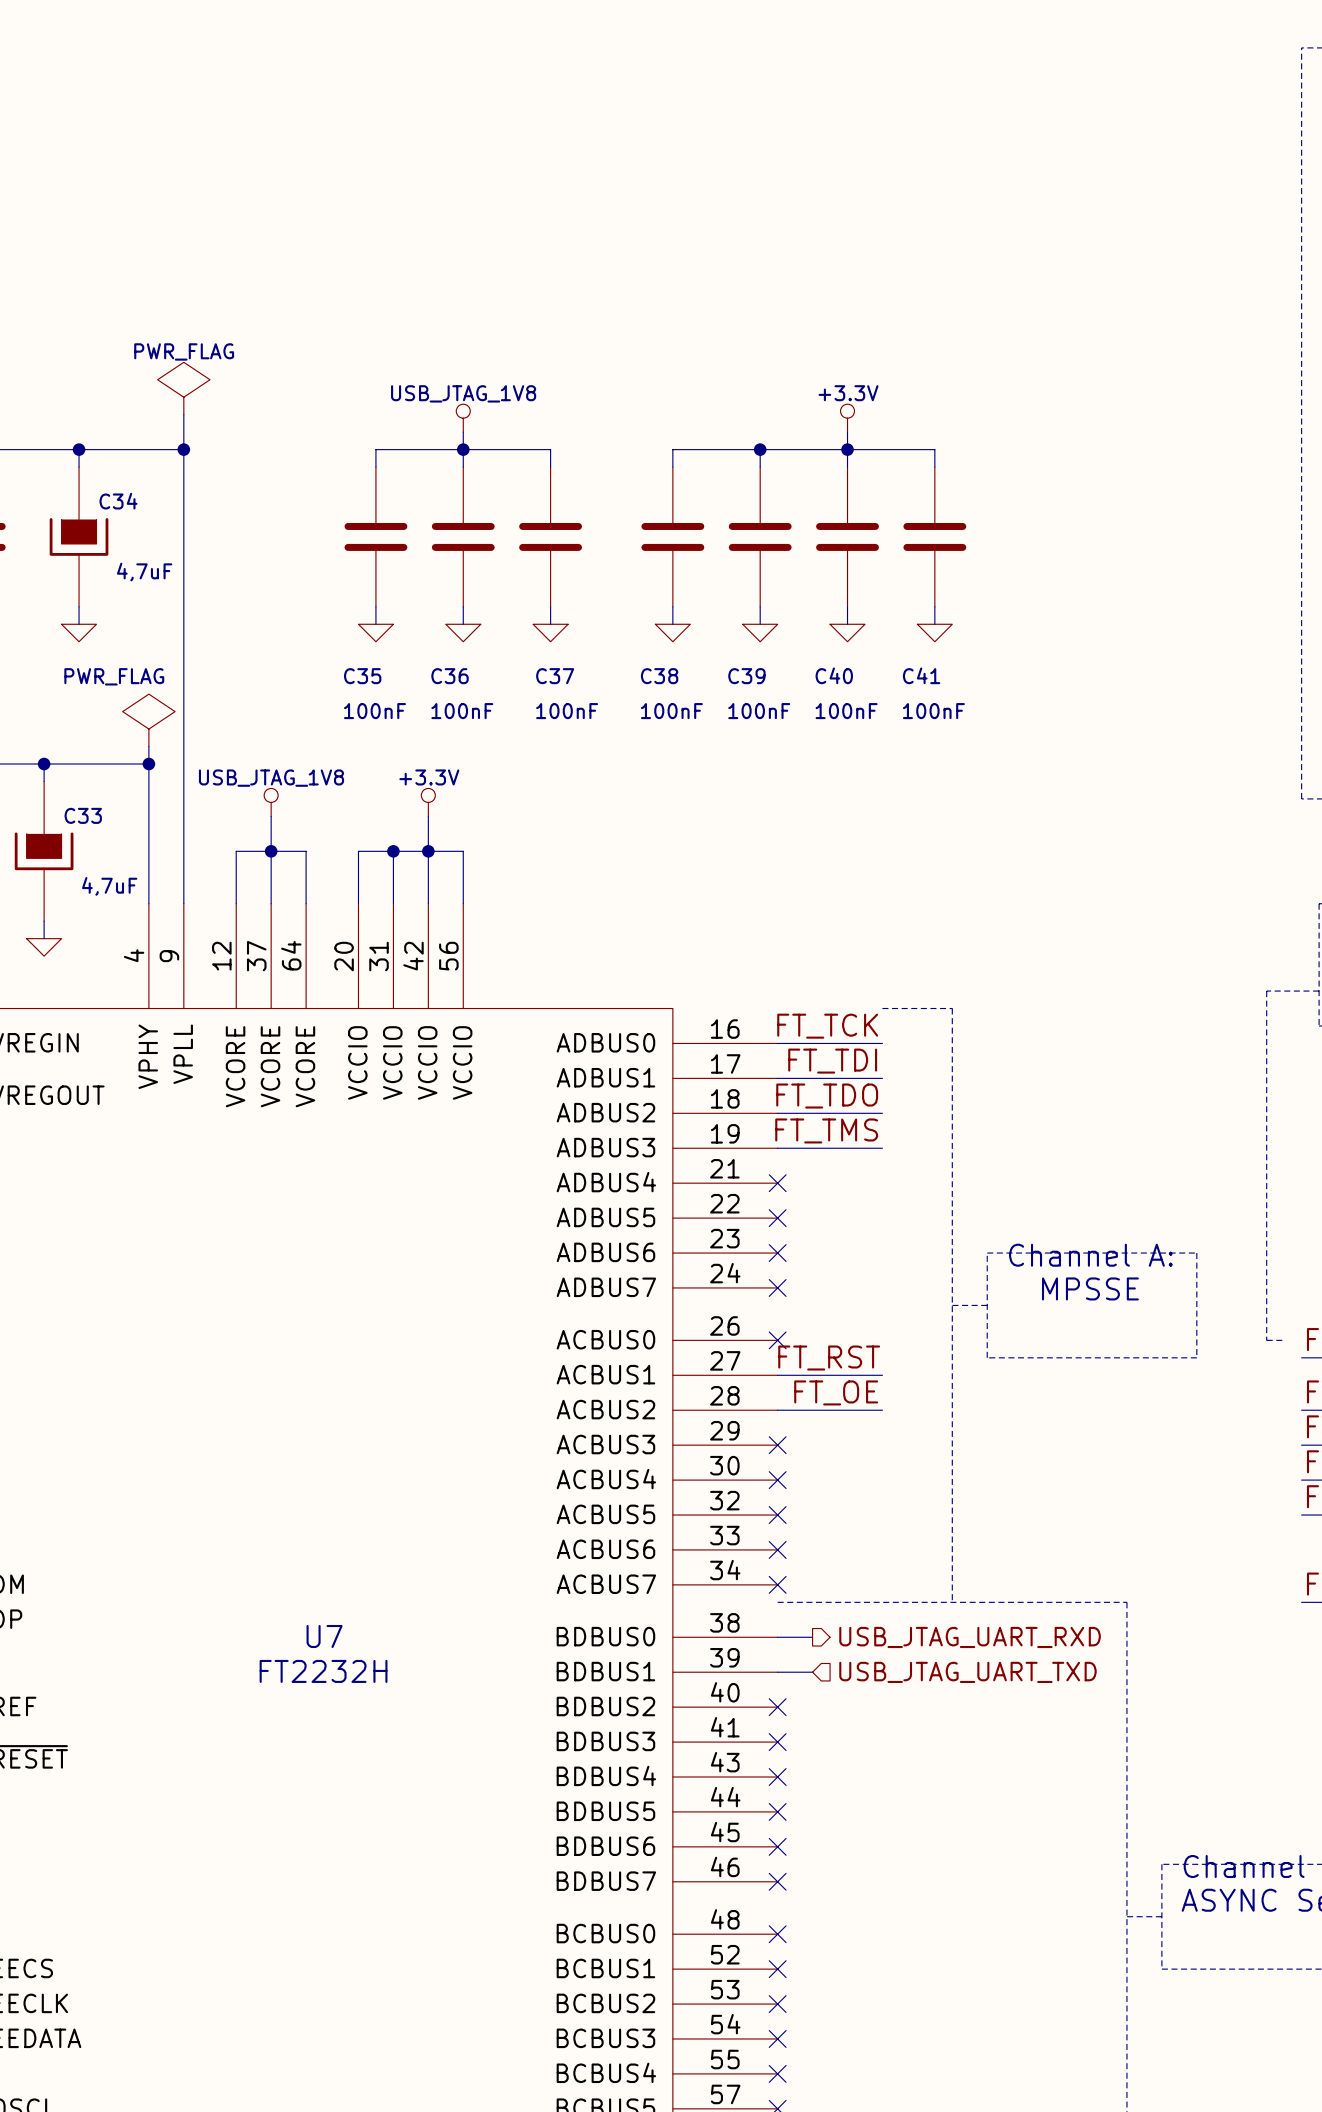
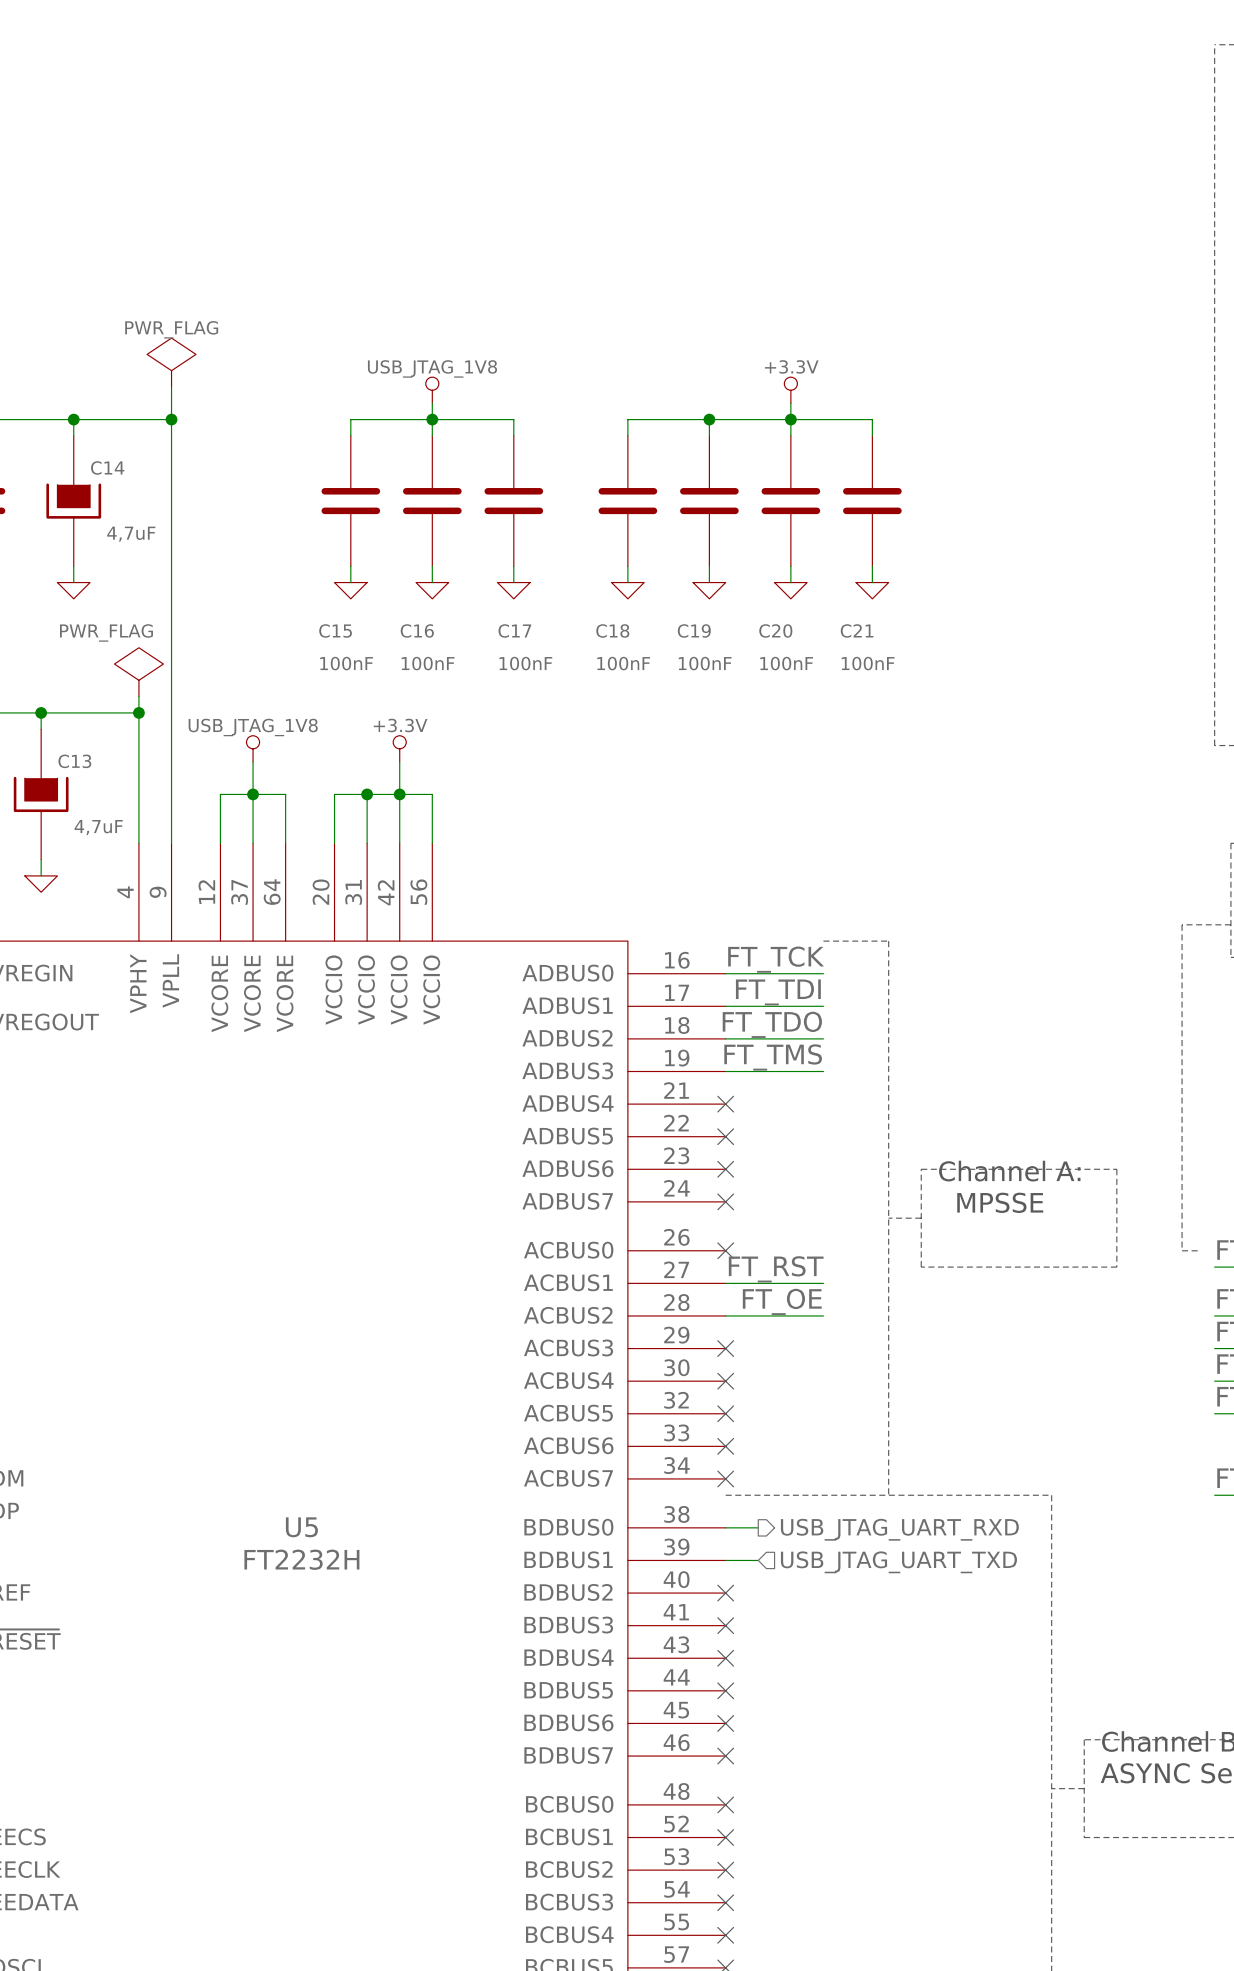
C34 name: C34 (118, 501) -> C14 (107, 467)
C40 name: C40 (834, 675) -> C20 (775, 630)
C41 name: C41 (921, 675) -> C21 (857, 630)
C35 name: C35 (362, 676) -> C15 (335, 630)
C36 name: C36 (450, 676) -> C16 (417, 630)
C37 name: C37 (555, 676) -> C17 (514, 630)
C38 name: C38 (659, 676) -> C18 (612, 630)
C39 name: C39 (746, 676) -> C19 (694, 630)
C33 name: C33 (83, 815) -> C13 (74, 761)
U7 name: U7 (324, 1636) -> U5 (301, 1527)

